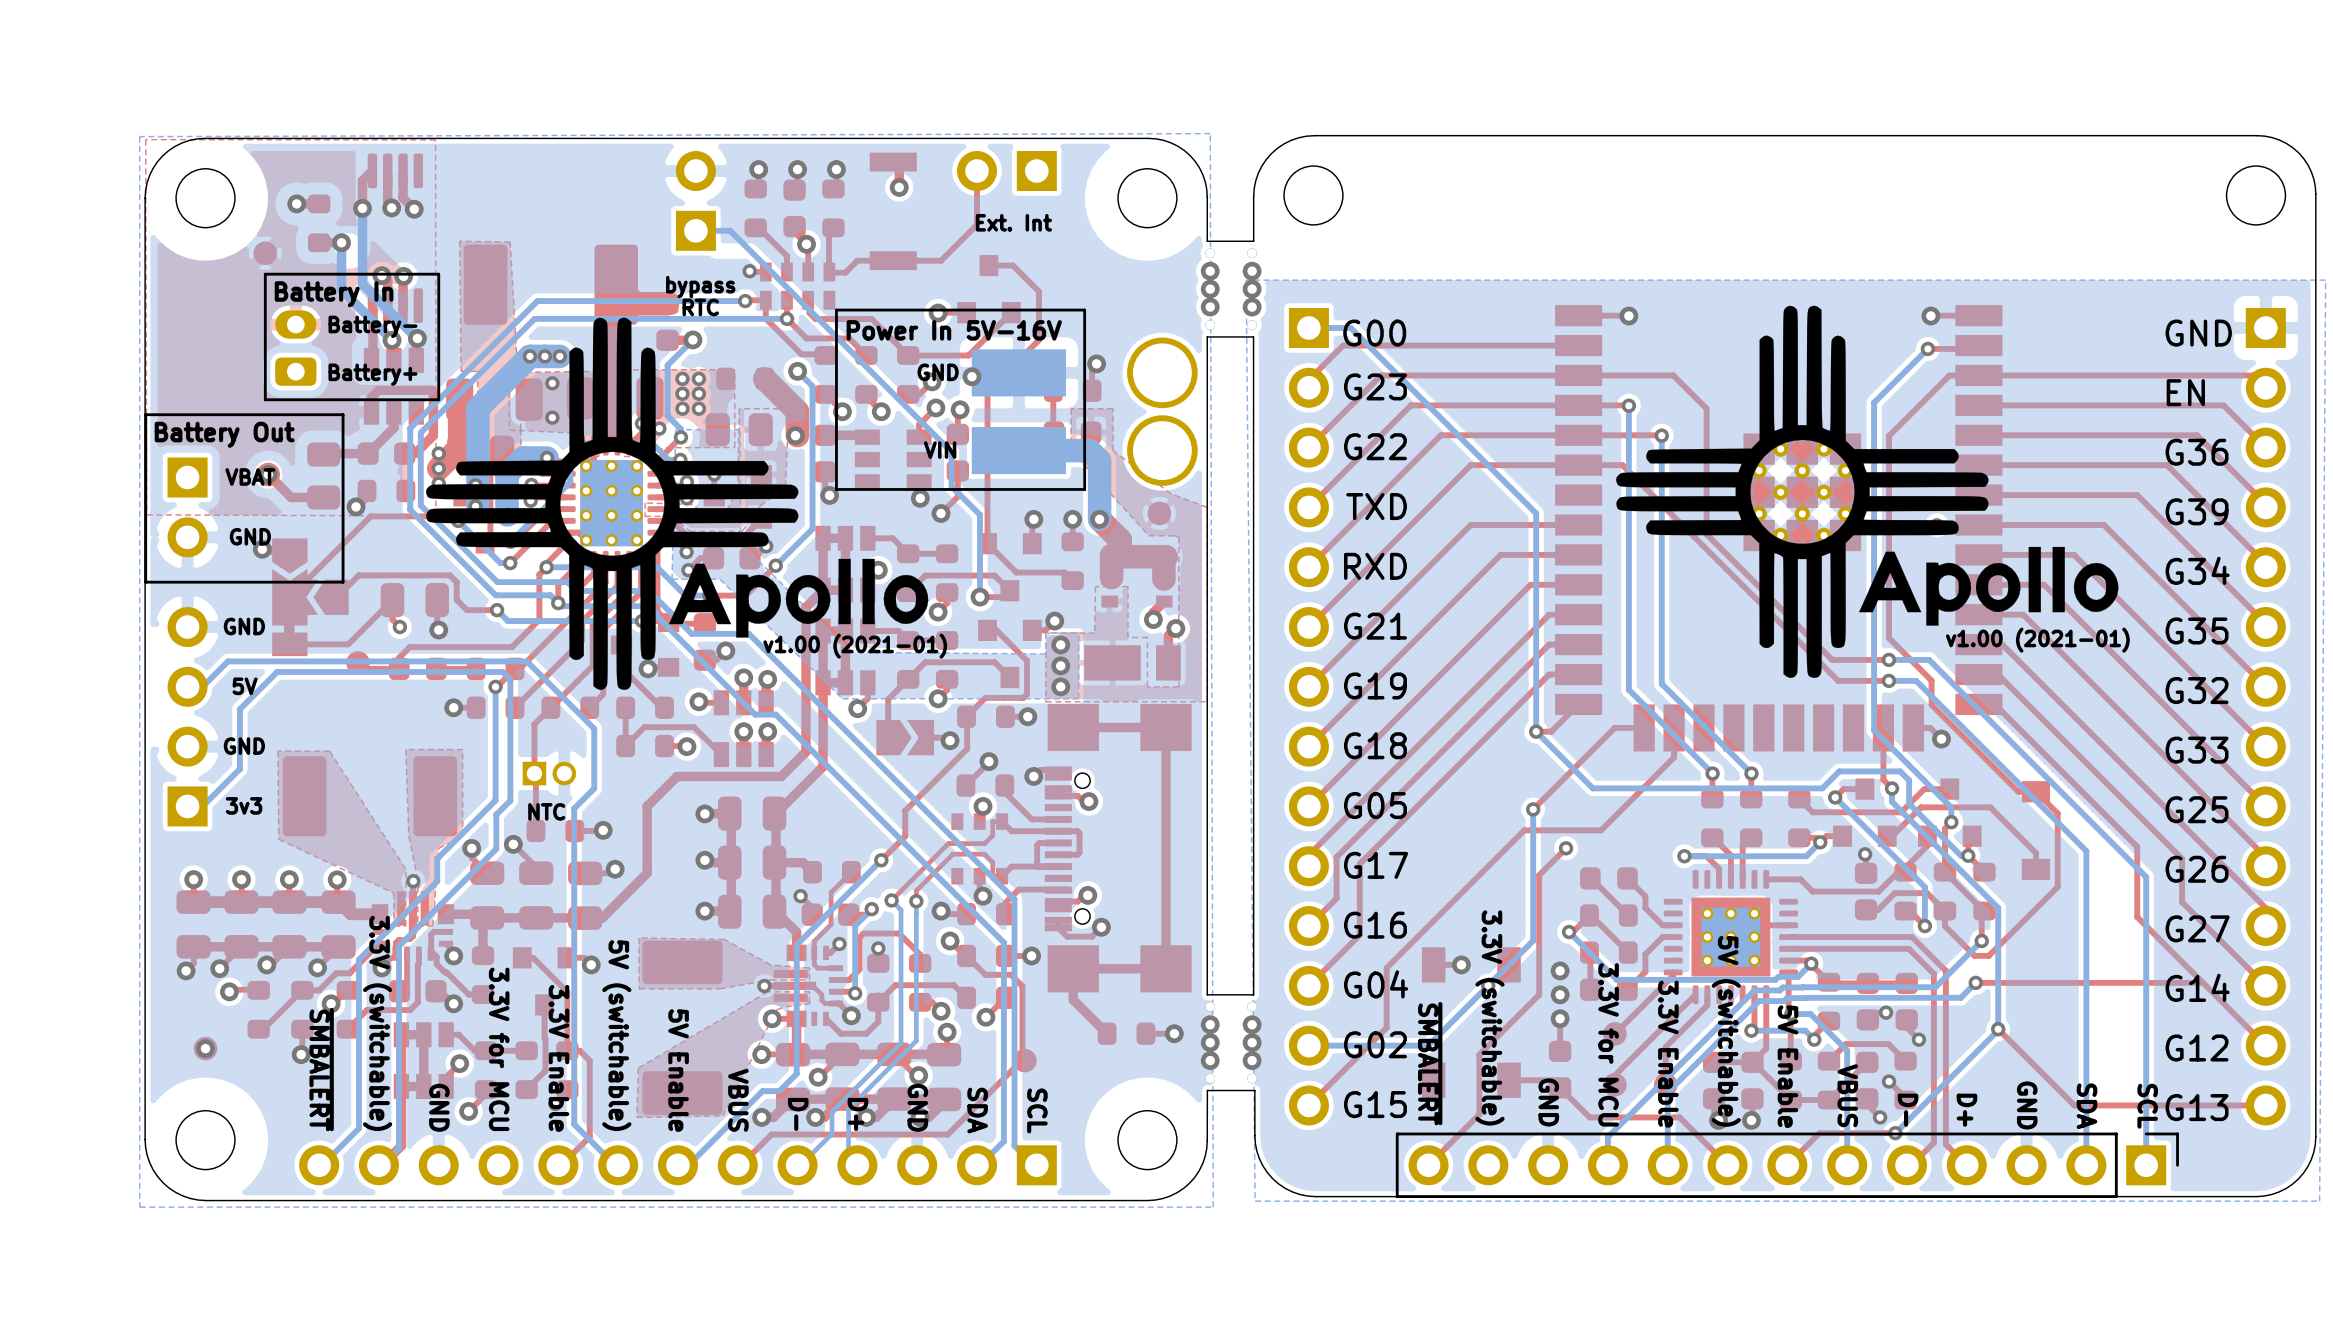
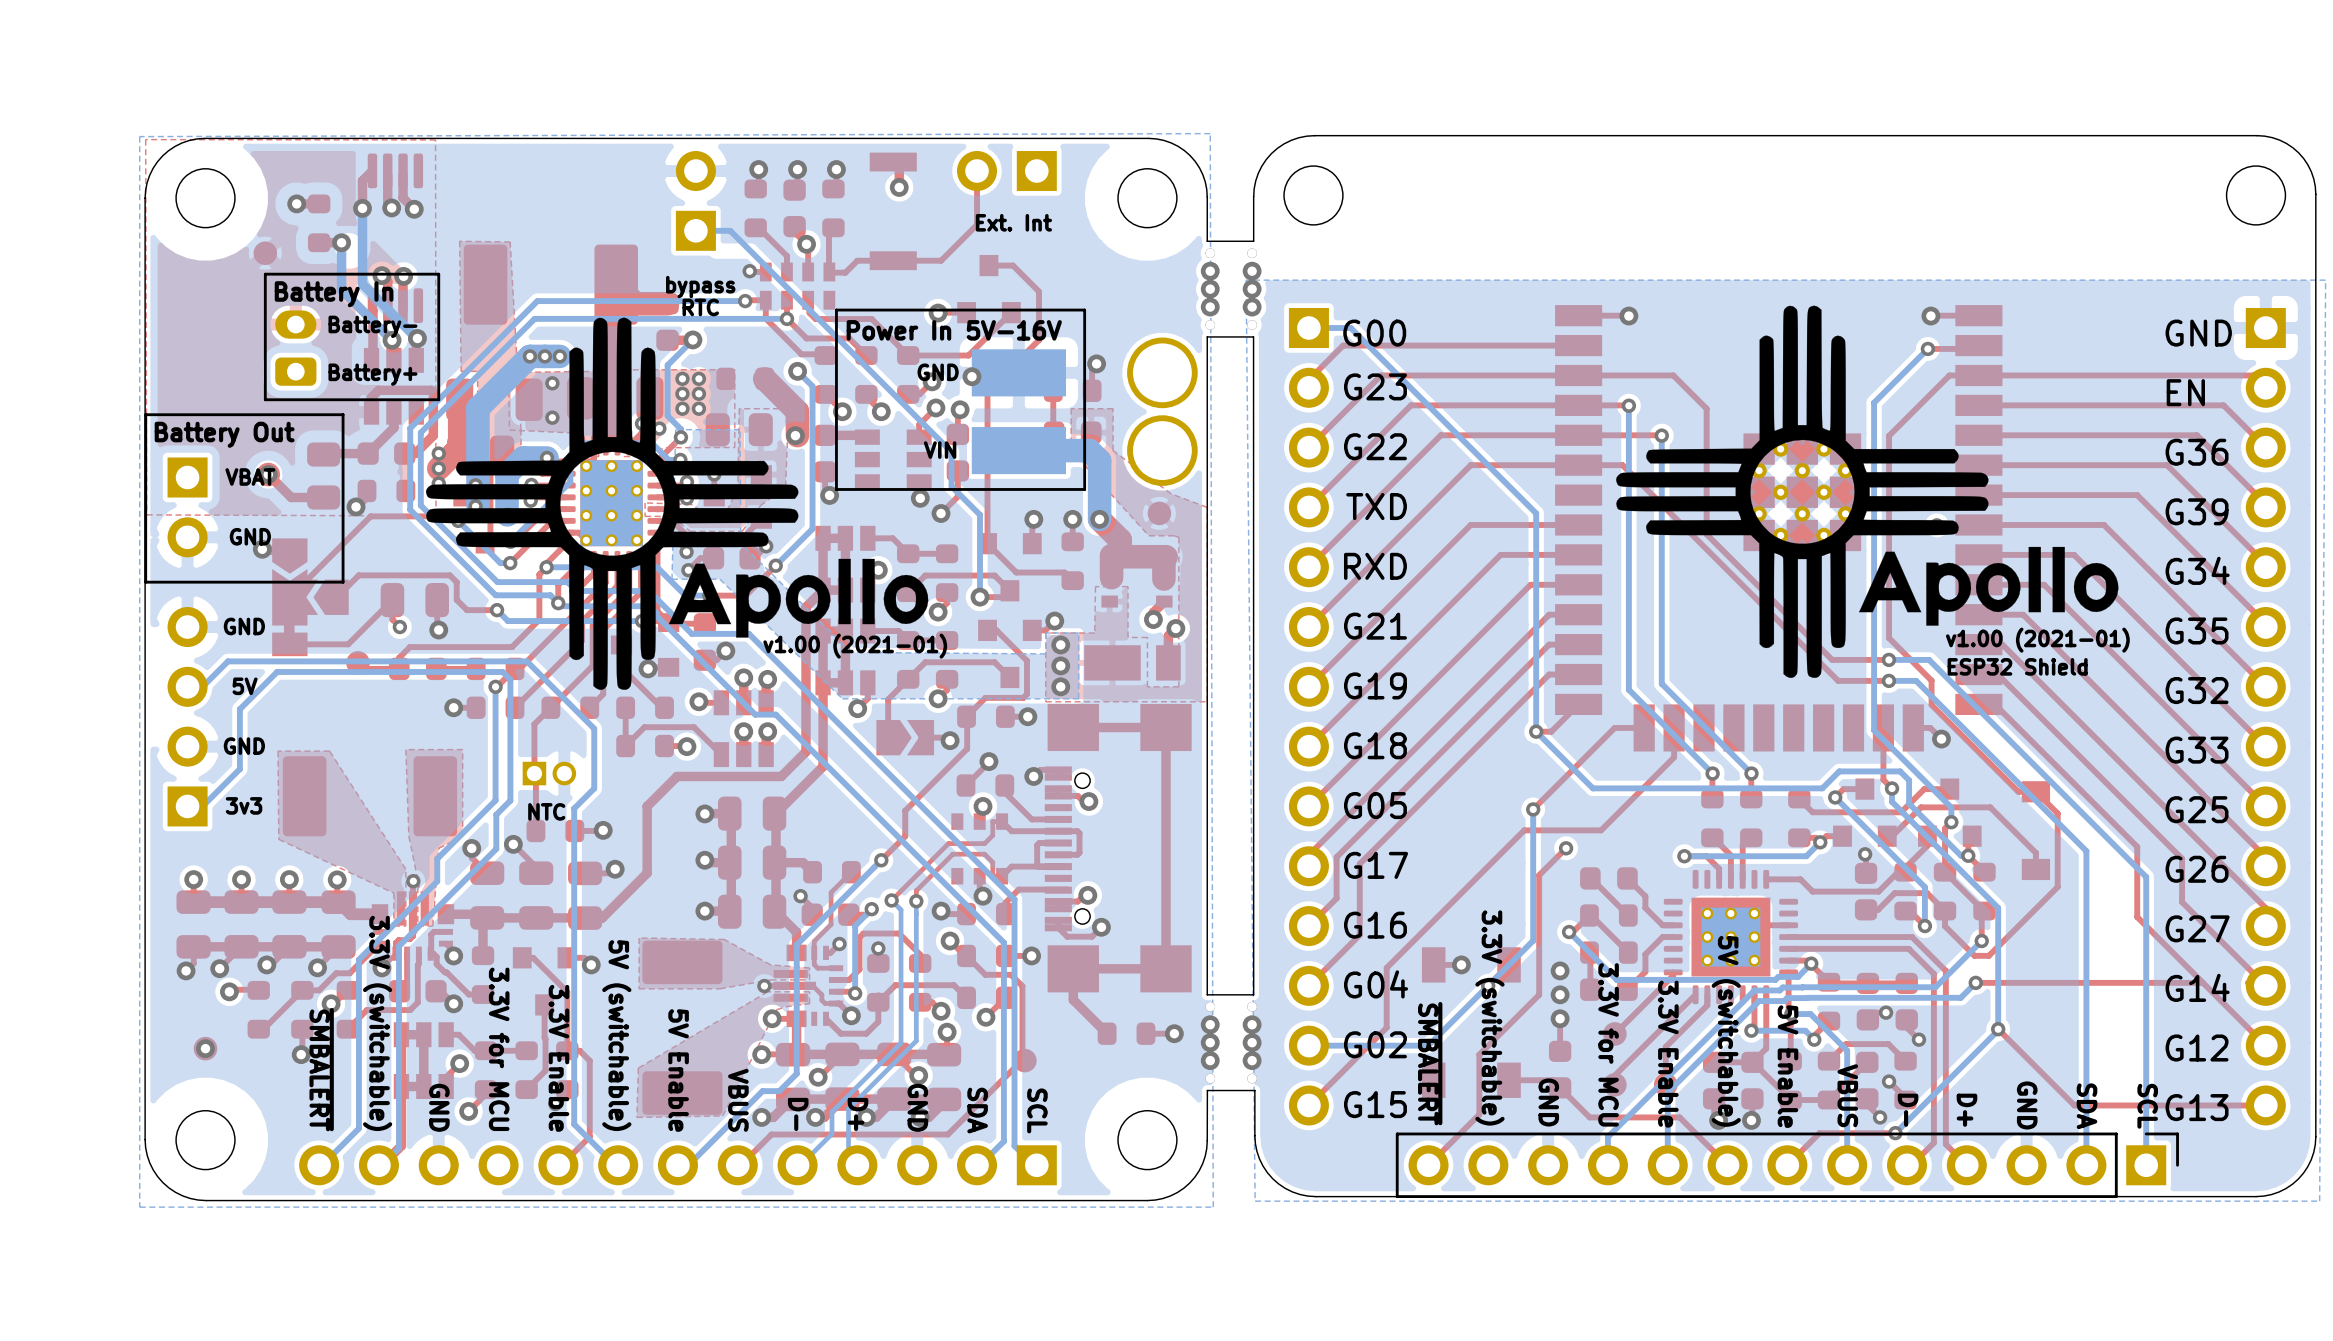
text: none -> ESP32 Shield (2017, 666)

